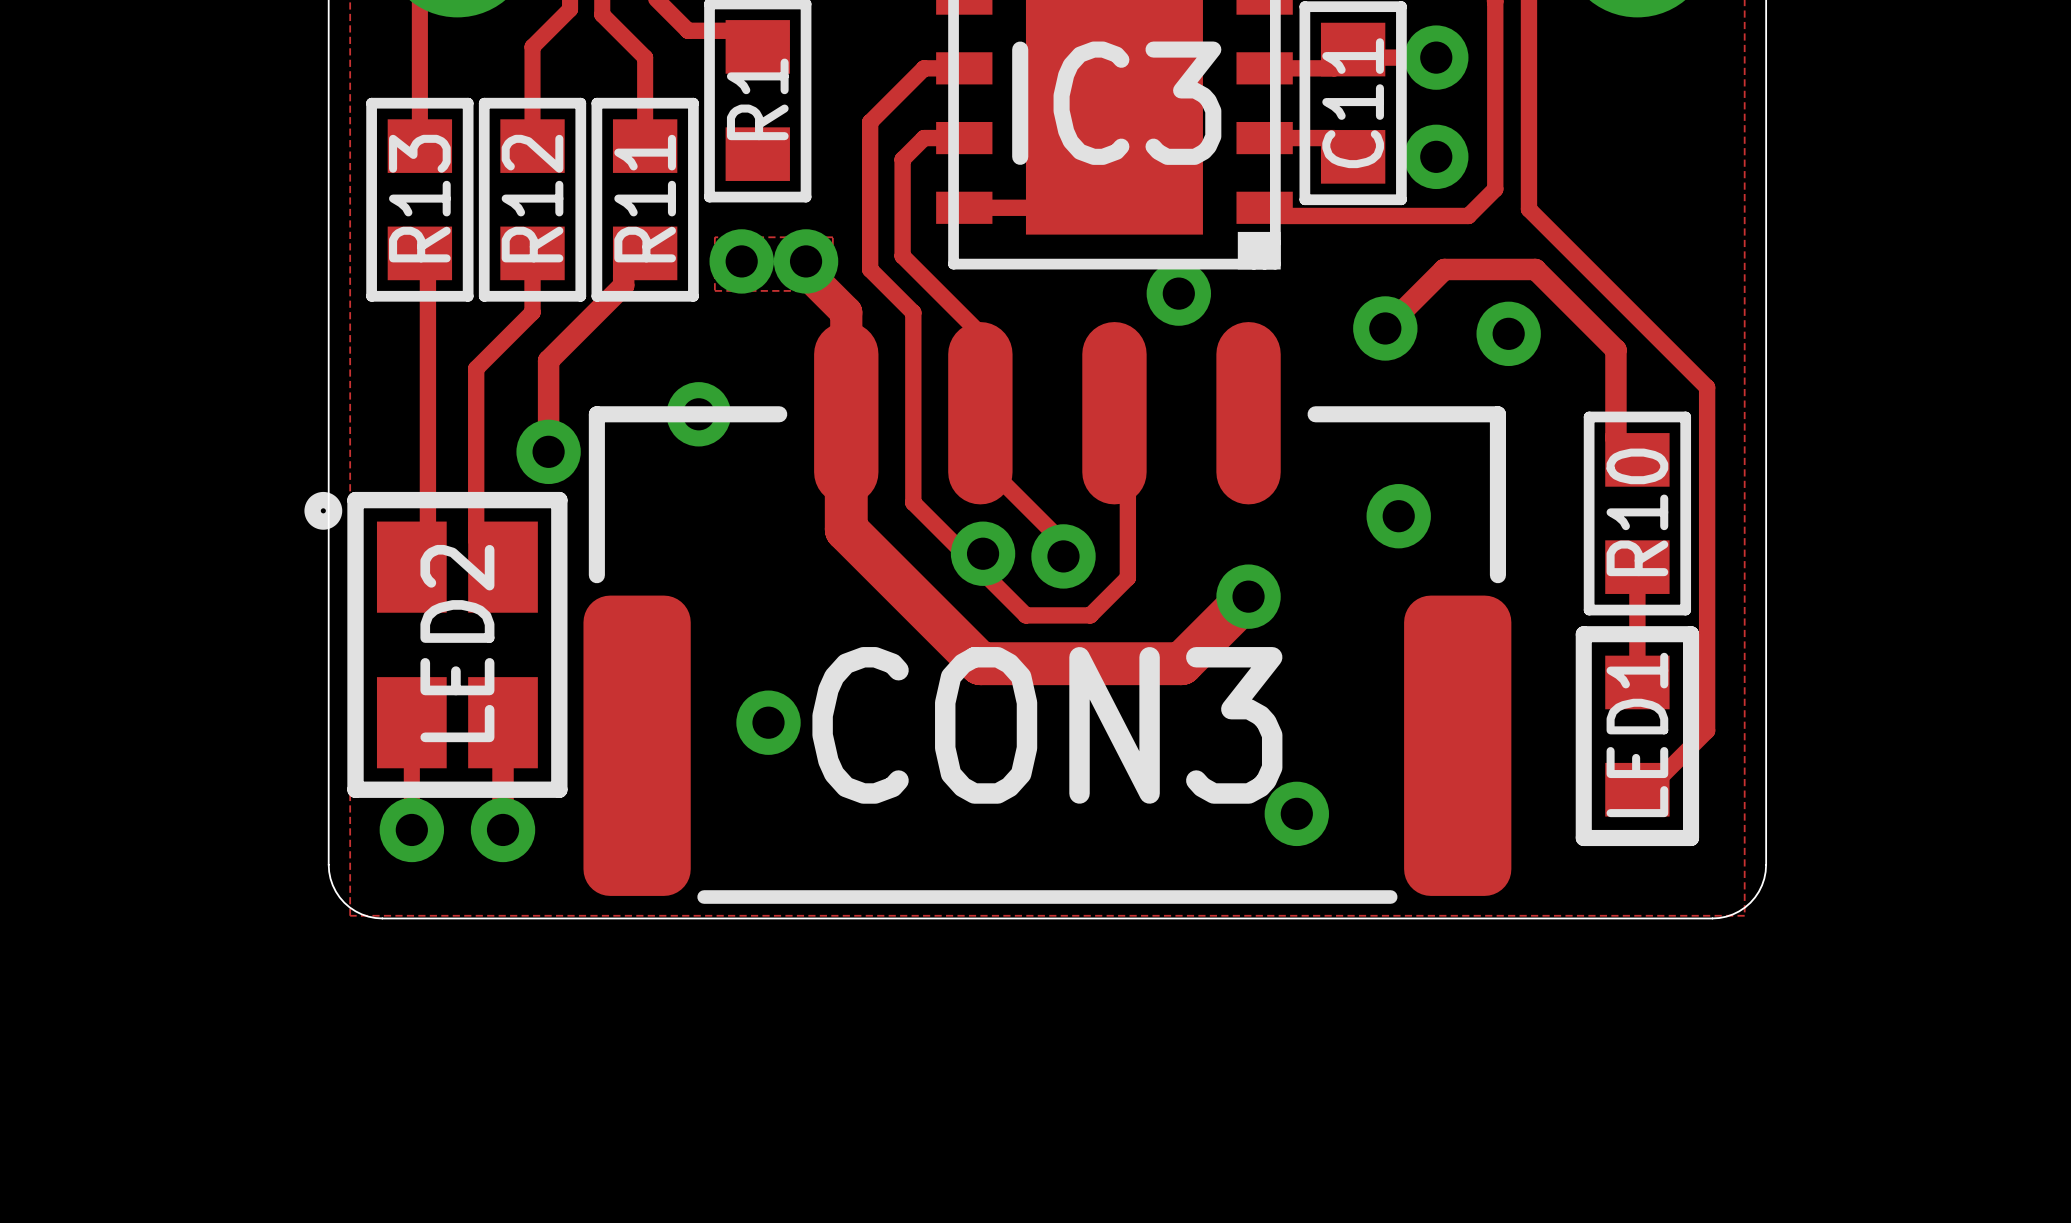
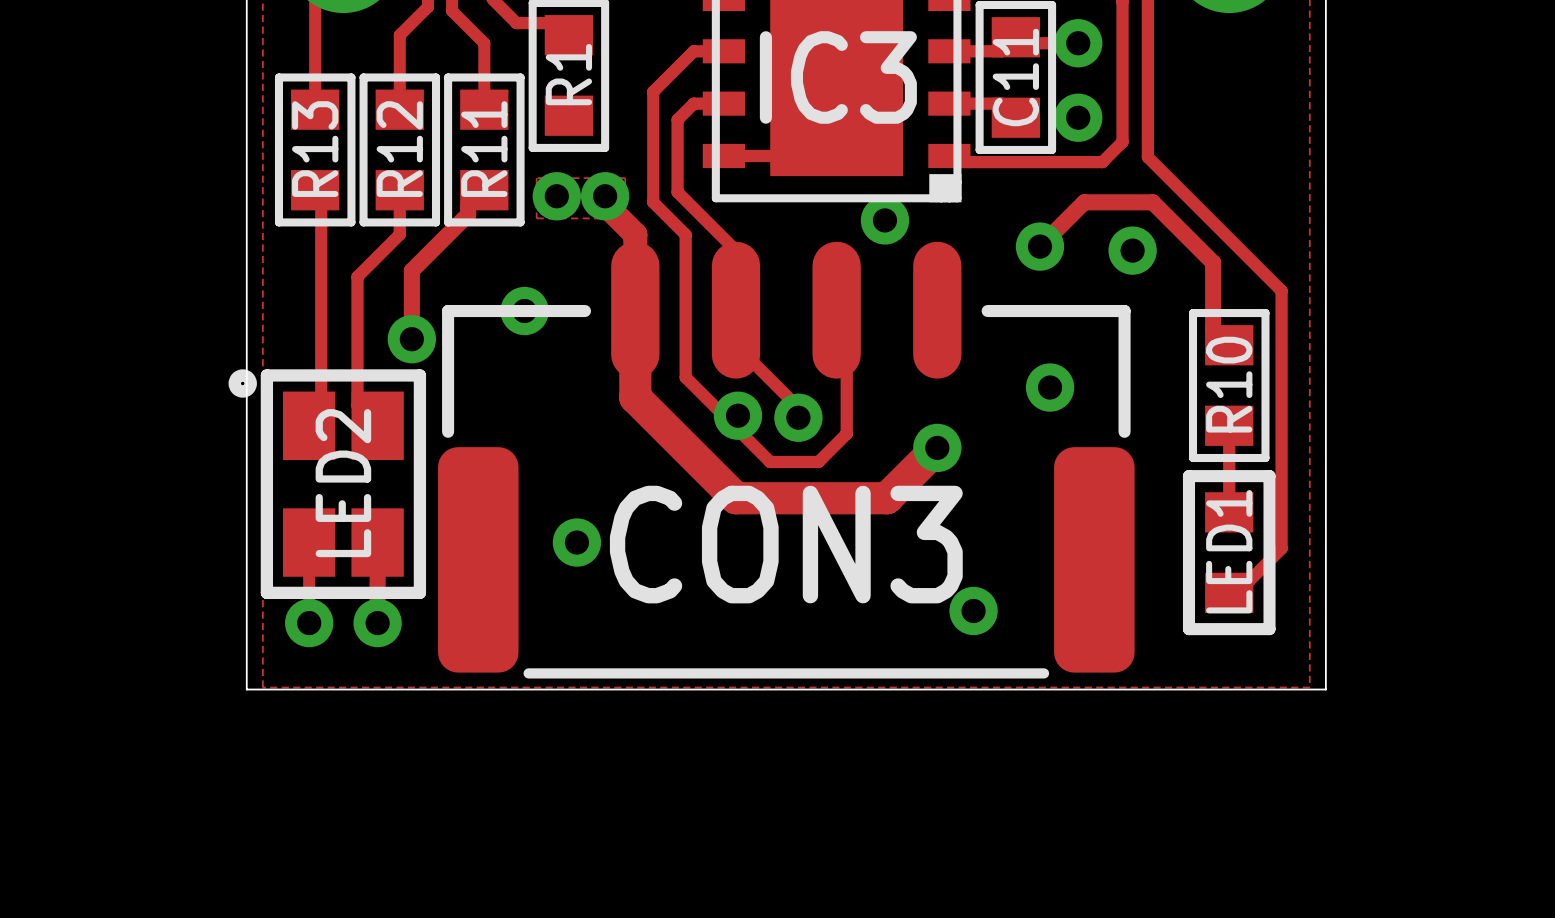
board edge: (328, 864) (332, 885) (344, 902) (361, 914) (382, 918) -> (246, 649) (246, 689) (287, 689)
board edge: (1766, 864) (1762, 885) (1750, 902) (1733, 914) (1712, 918) -> (1325, 649) (1325, 689) (1285, 689)

